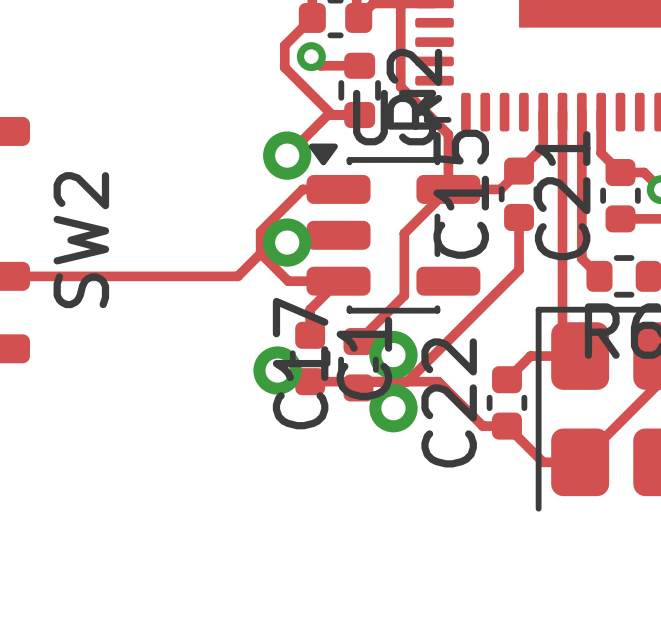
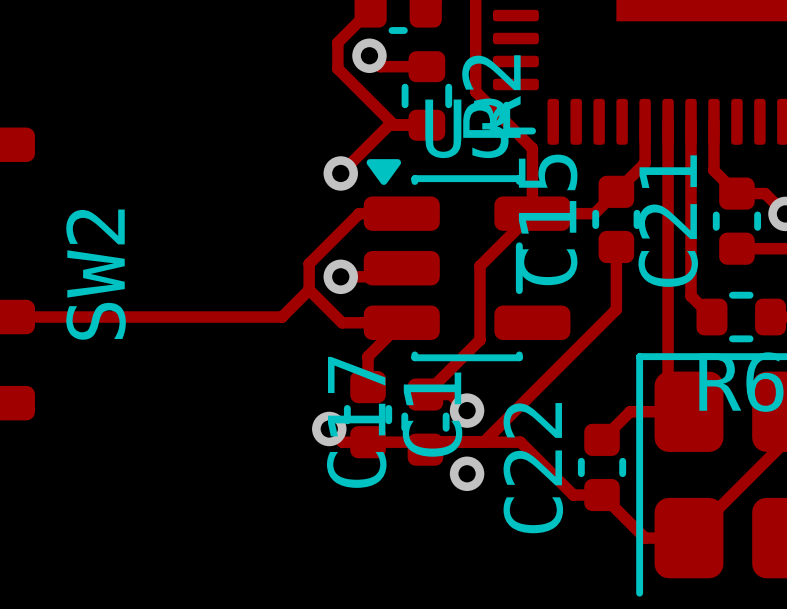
via size: [263, 131, 312, 180] -> [323, 156, 358, 191]
via size: [263, 218, 312, 267] -> [323, 259, 358, 295]
via size: [369, 330, 418, 380] -> [449, 393, 485, 428]
via size: [253, 346, 302, 395] -> [312, 411, 347, 447]
via size: [369, 384, 418, 433] -> [449, 456, 485, 491]

